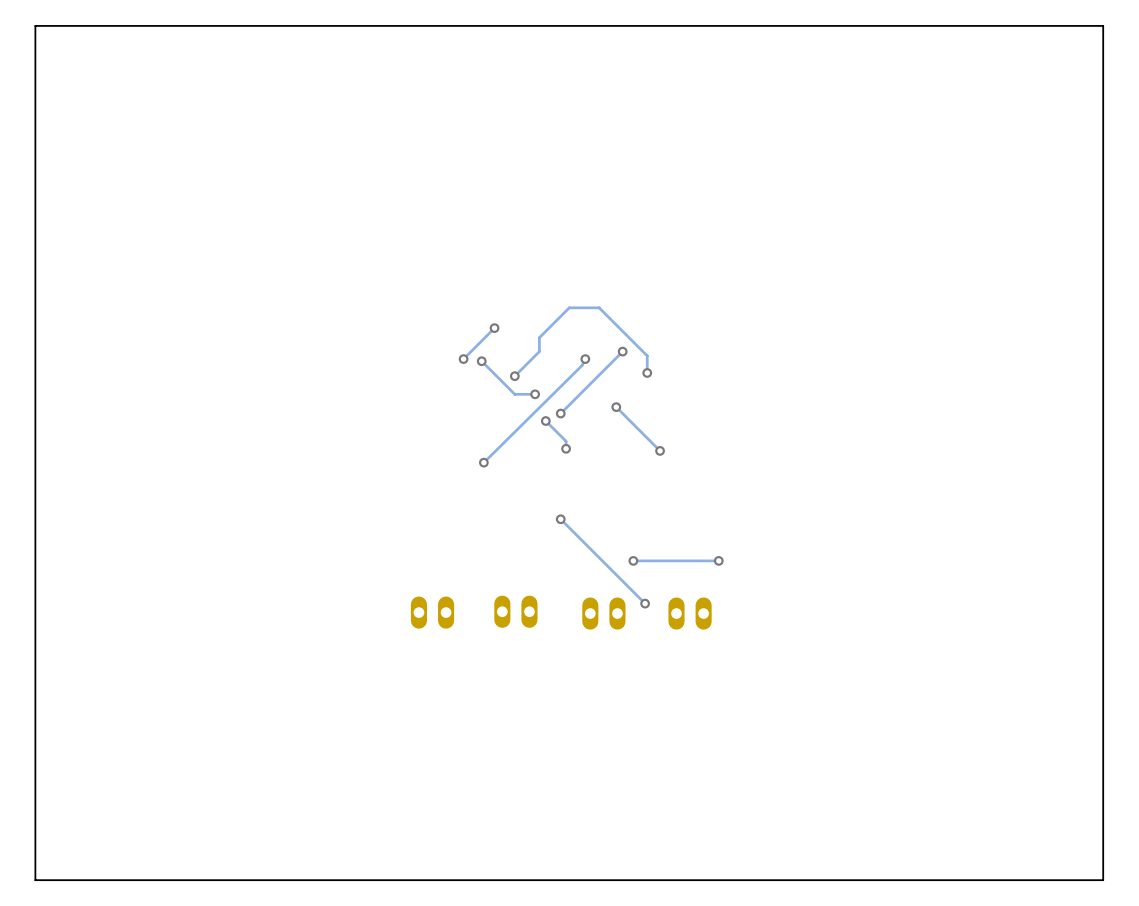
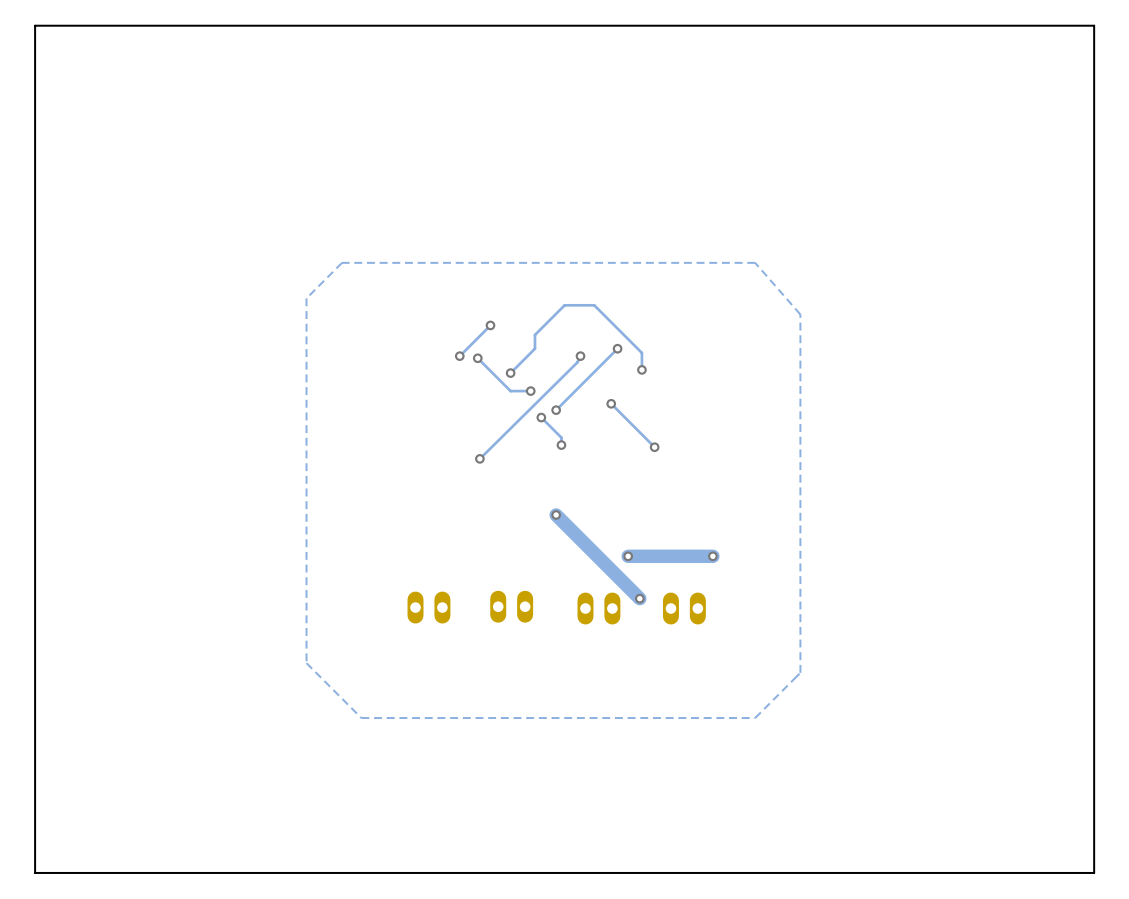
zone outline: none -> (755, 262) (342, 262) (306, 298) (306, 663) (361, 718) (755, 718) (800, 672) (800, 314) (755, 262)
track width: thin (560, 519) (645, 603) -> thick (556, 515) (639, 598)
track width: thin (718, 560) (633, 560) -> thick (712, 556) (628, 556)

